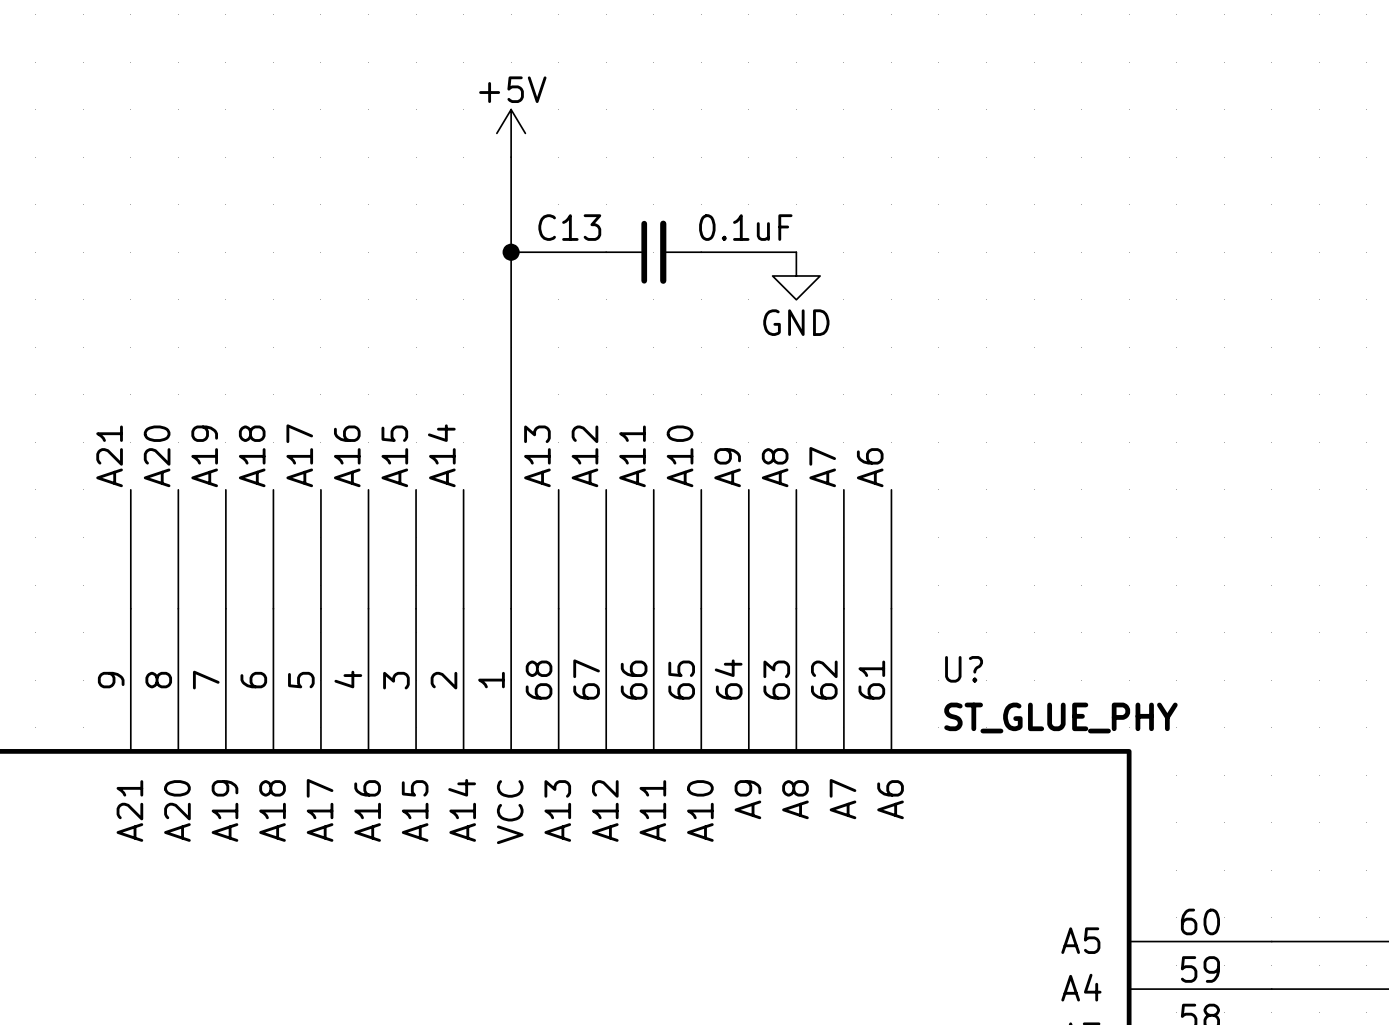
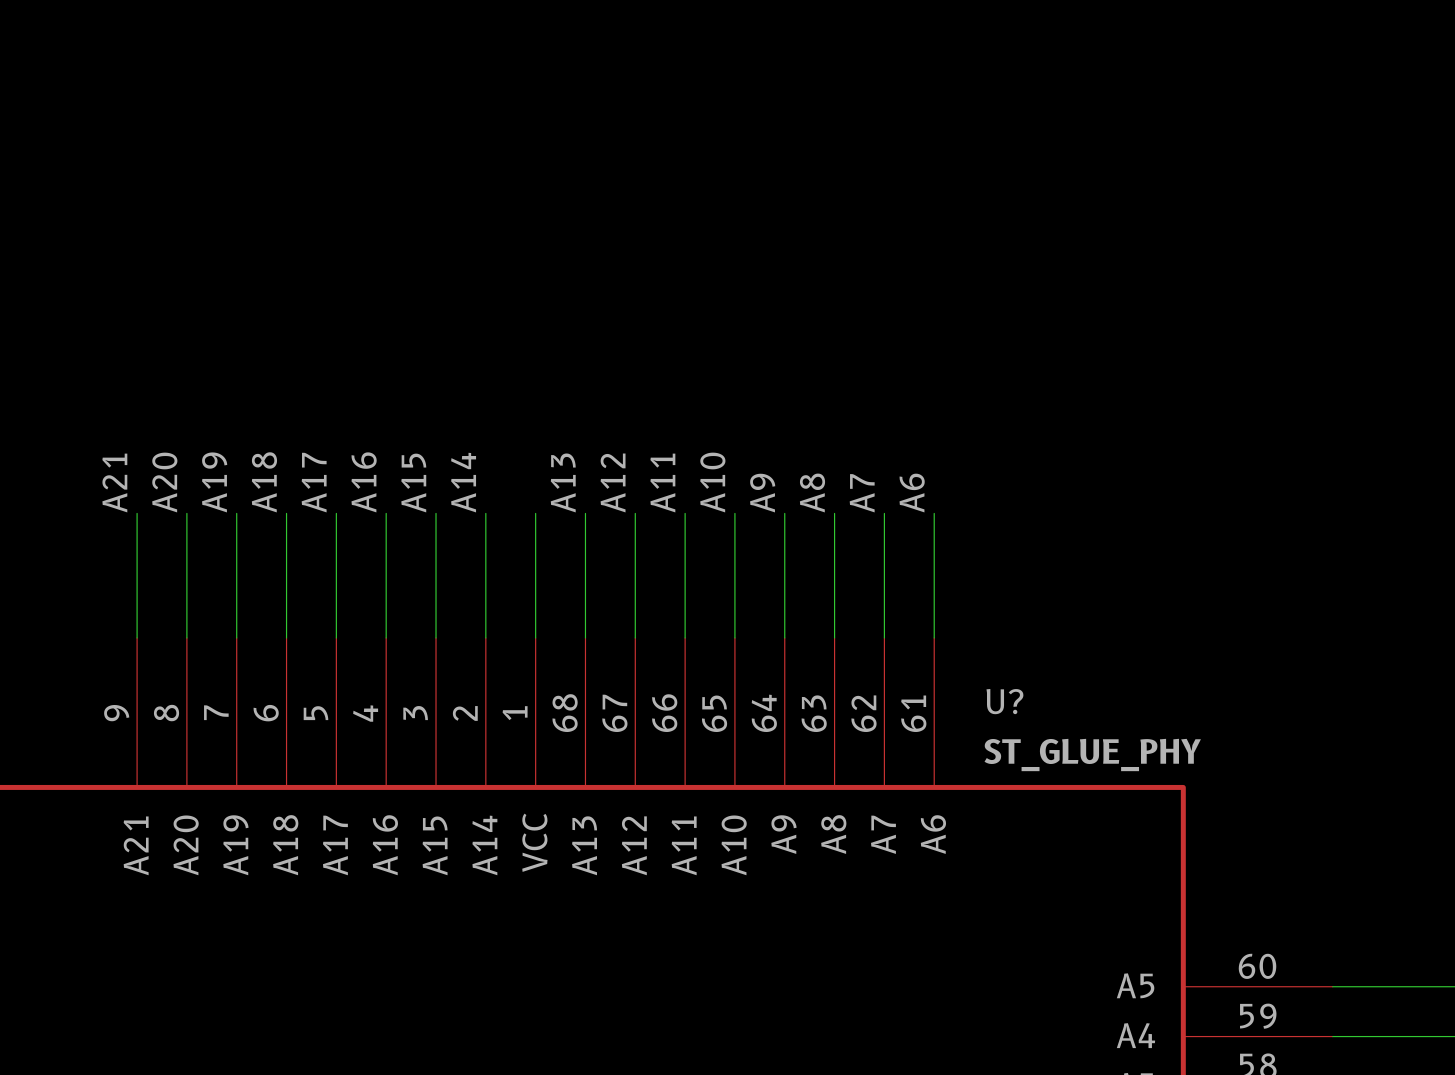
power symbol: +5V (511, 133) -> none
wire: (511, 157) (511, 489) -> none
wire: (511, 252) (606, 252) -> none
junction: (511, 252) -> none
C13: 0.1uF (653, 252) -> none
wire: (701, 252) (796, 252) -> none
power symbol: GND (796, 275) -> none

